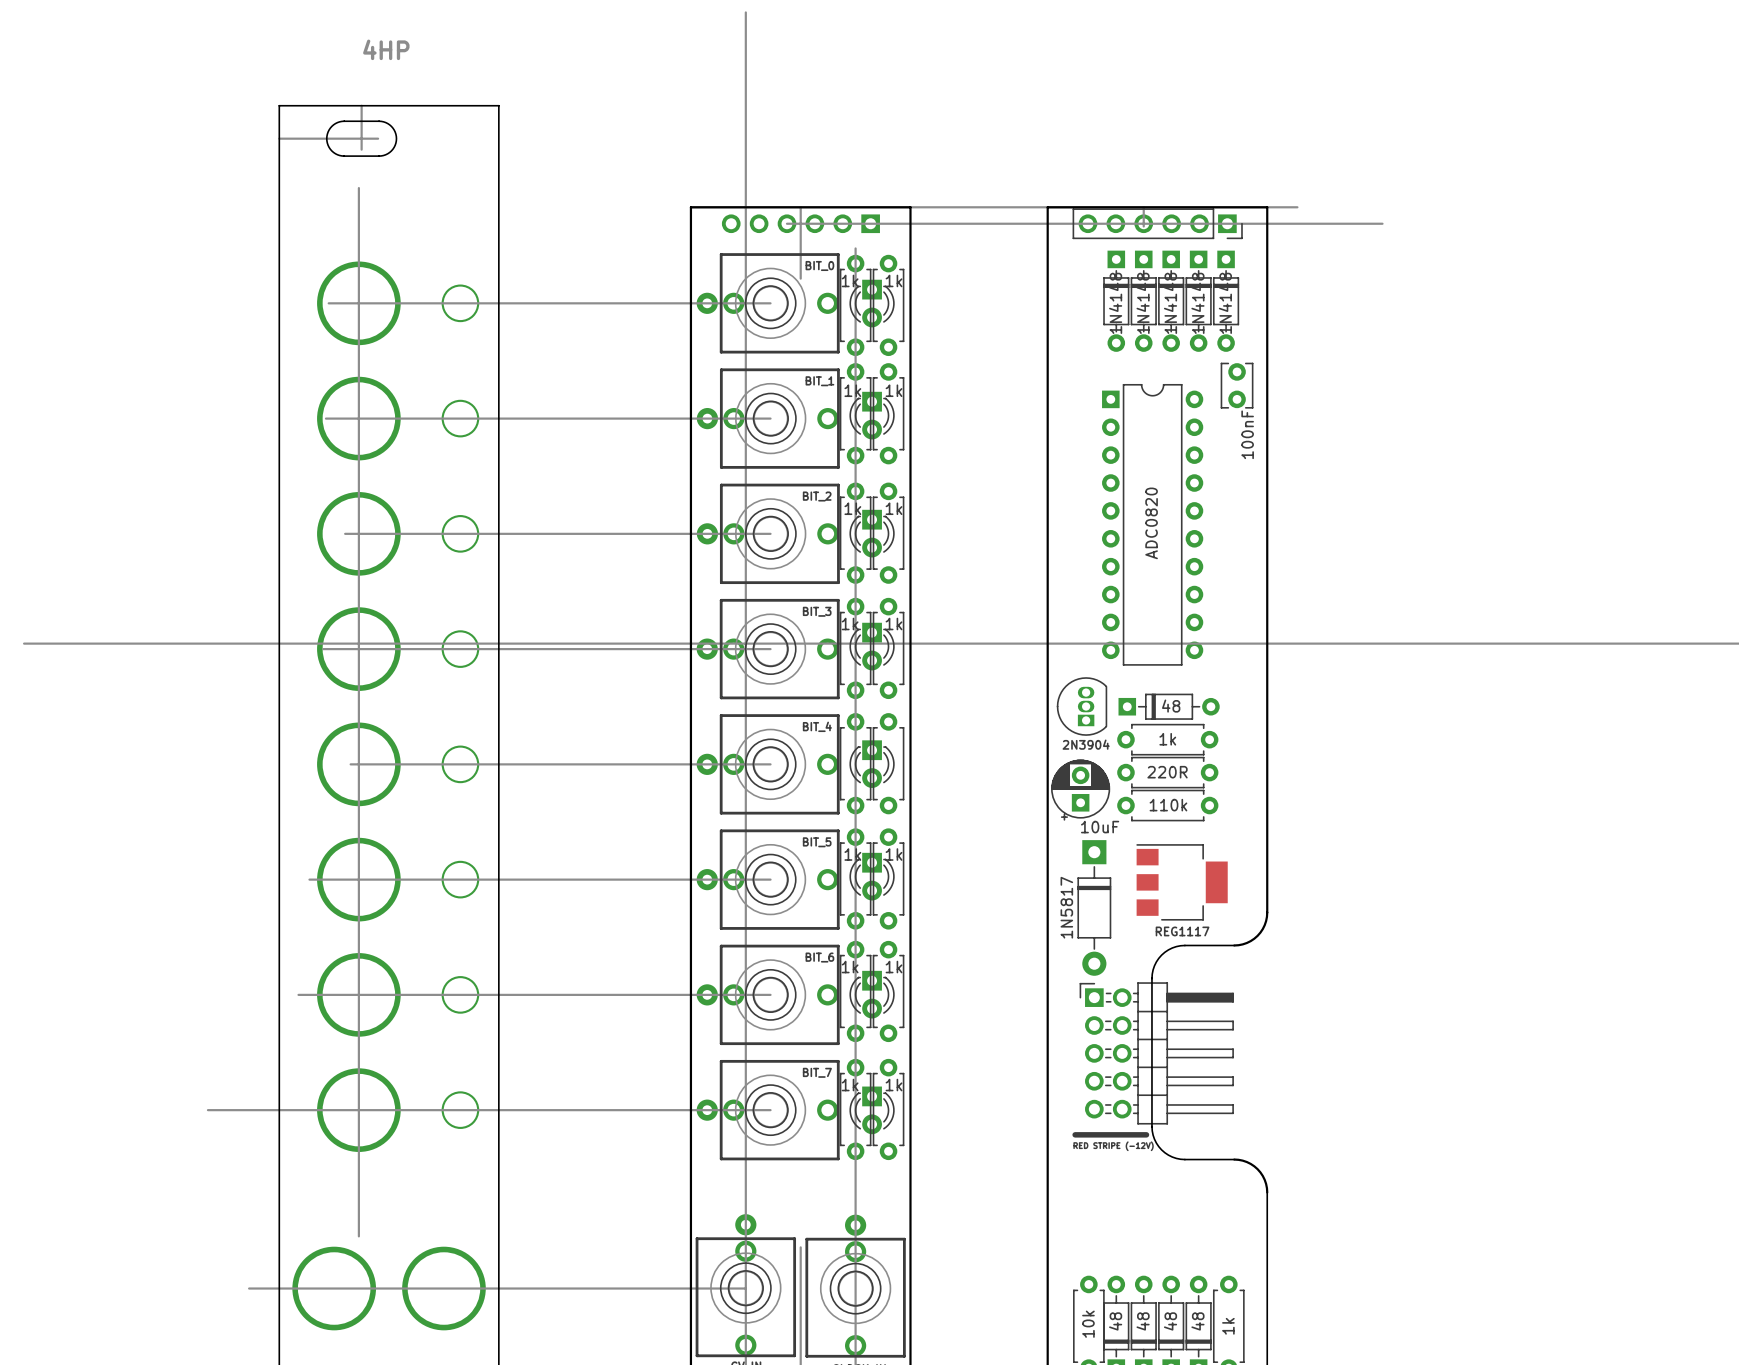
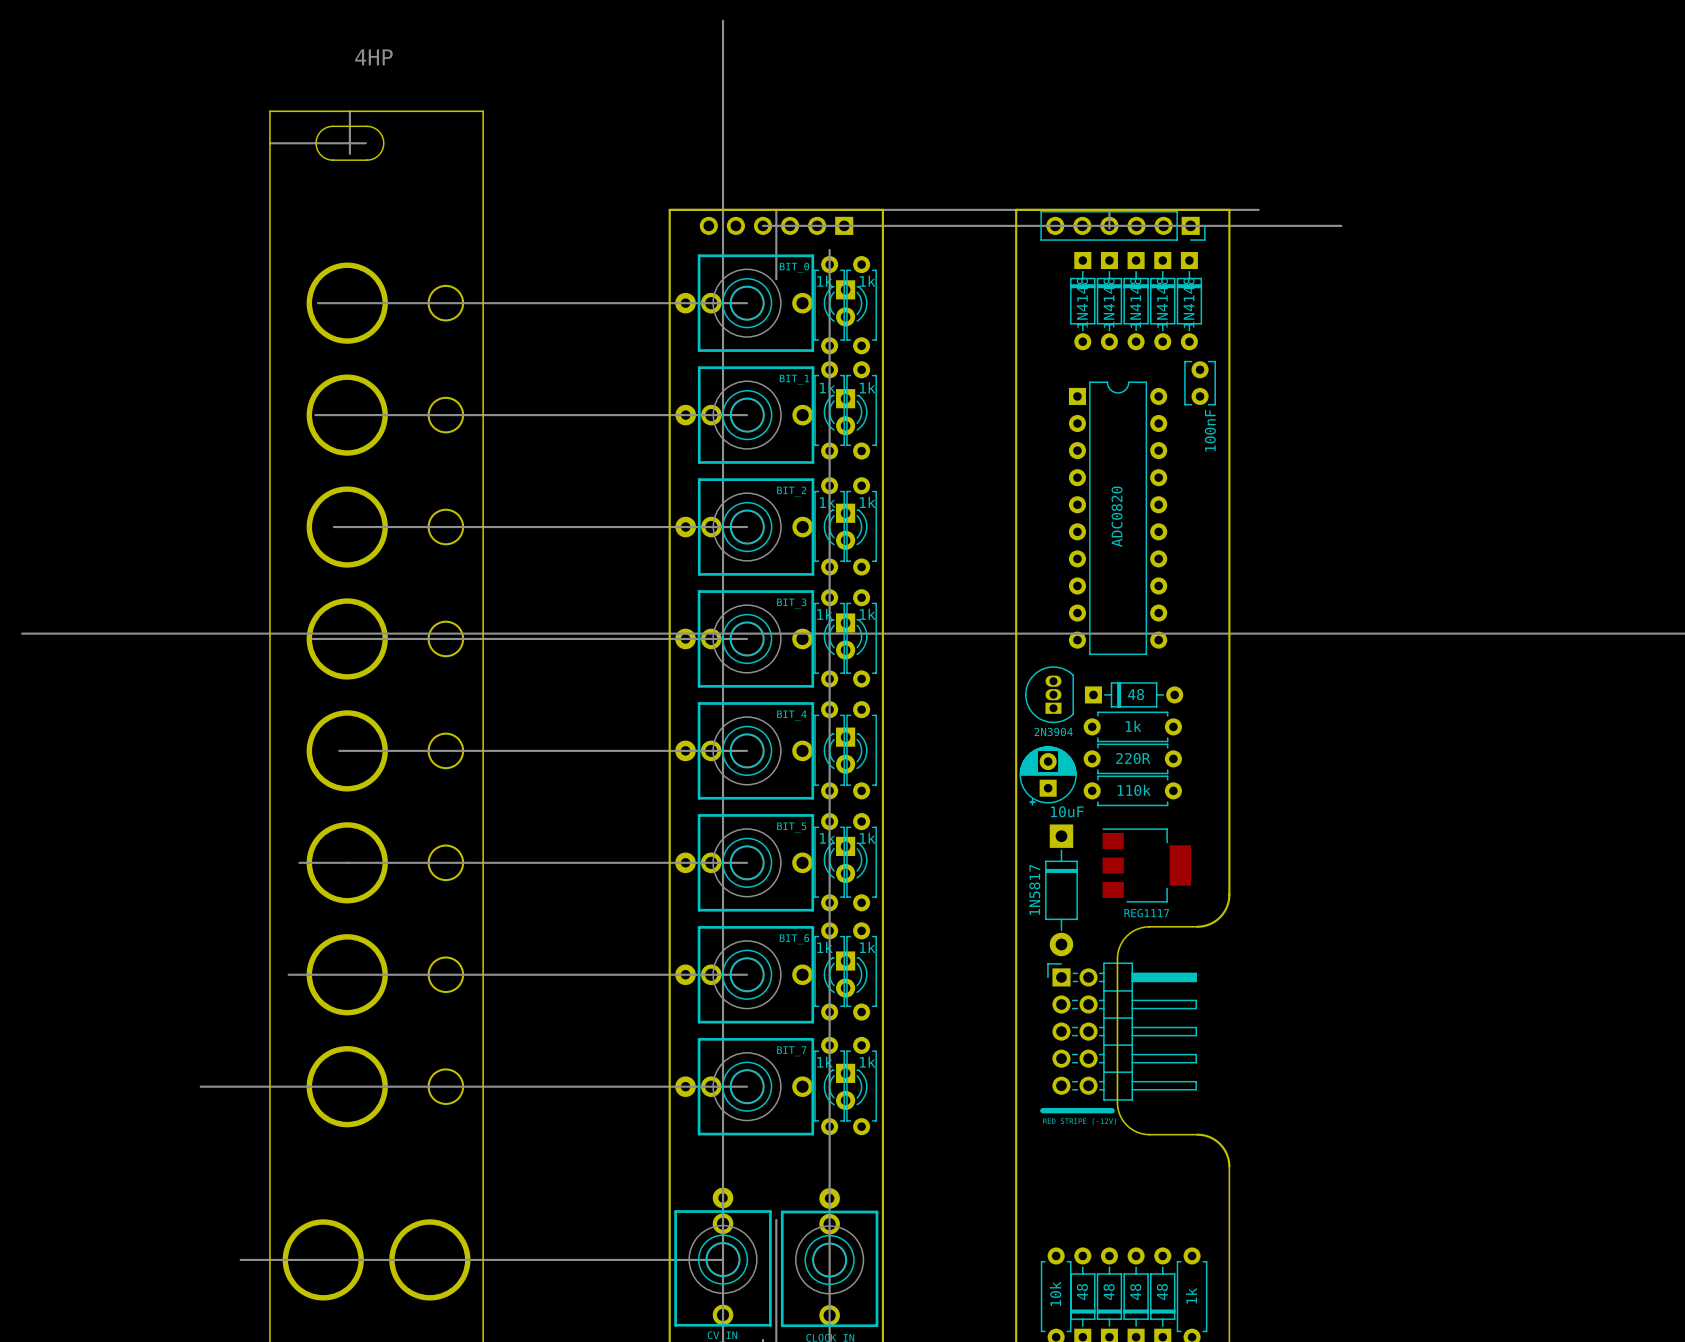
line: (358, 188) (358, 1236) -> none

